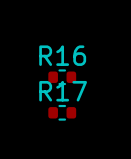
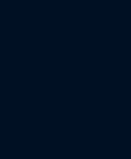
R16: (62, 77) -> none
R17: (62, 112) -> none

